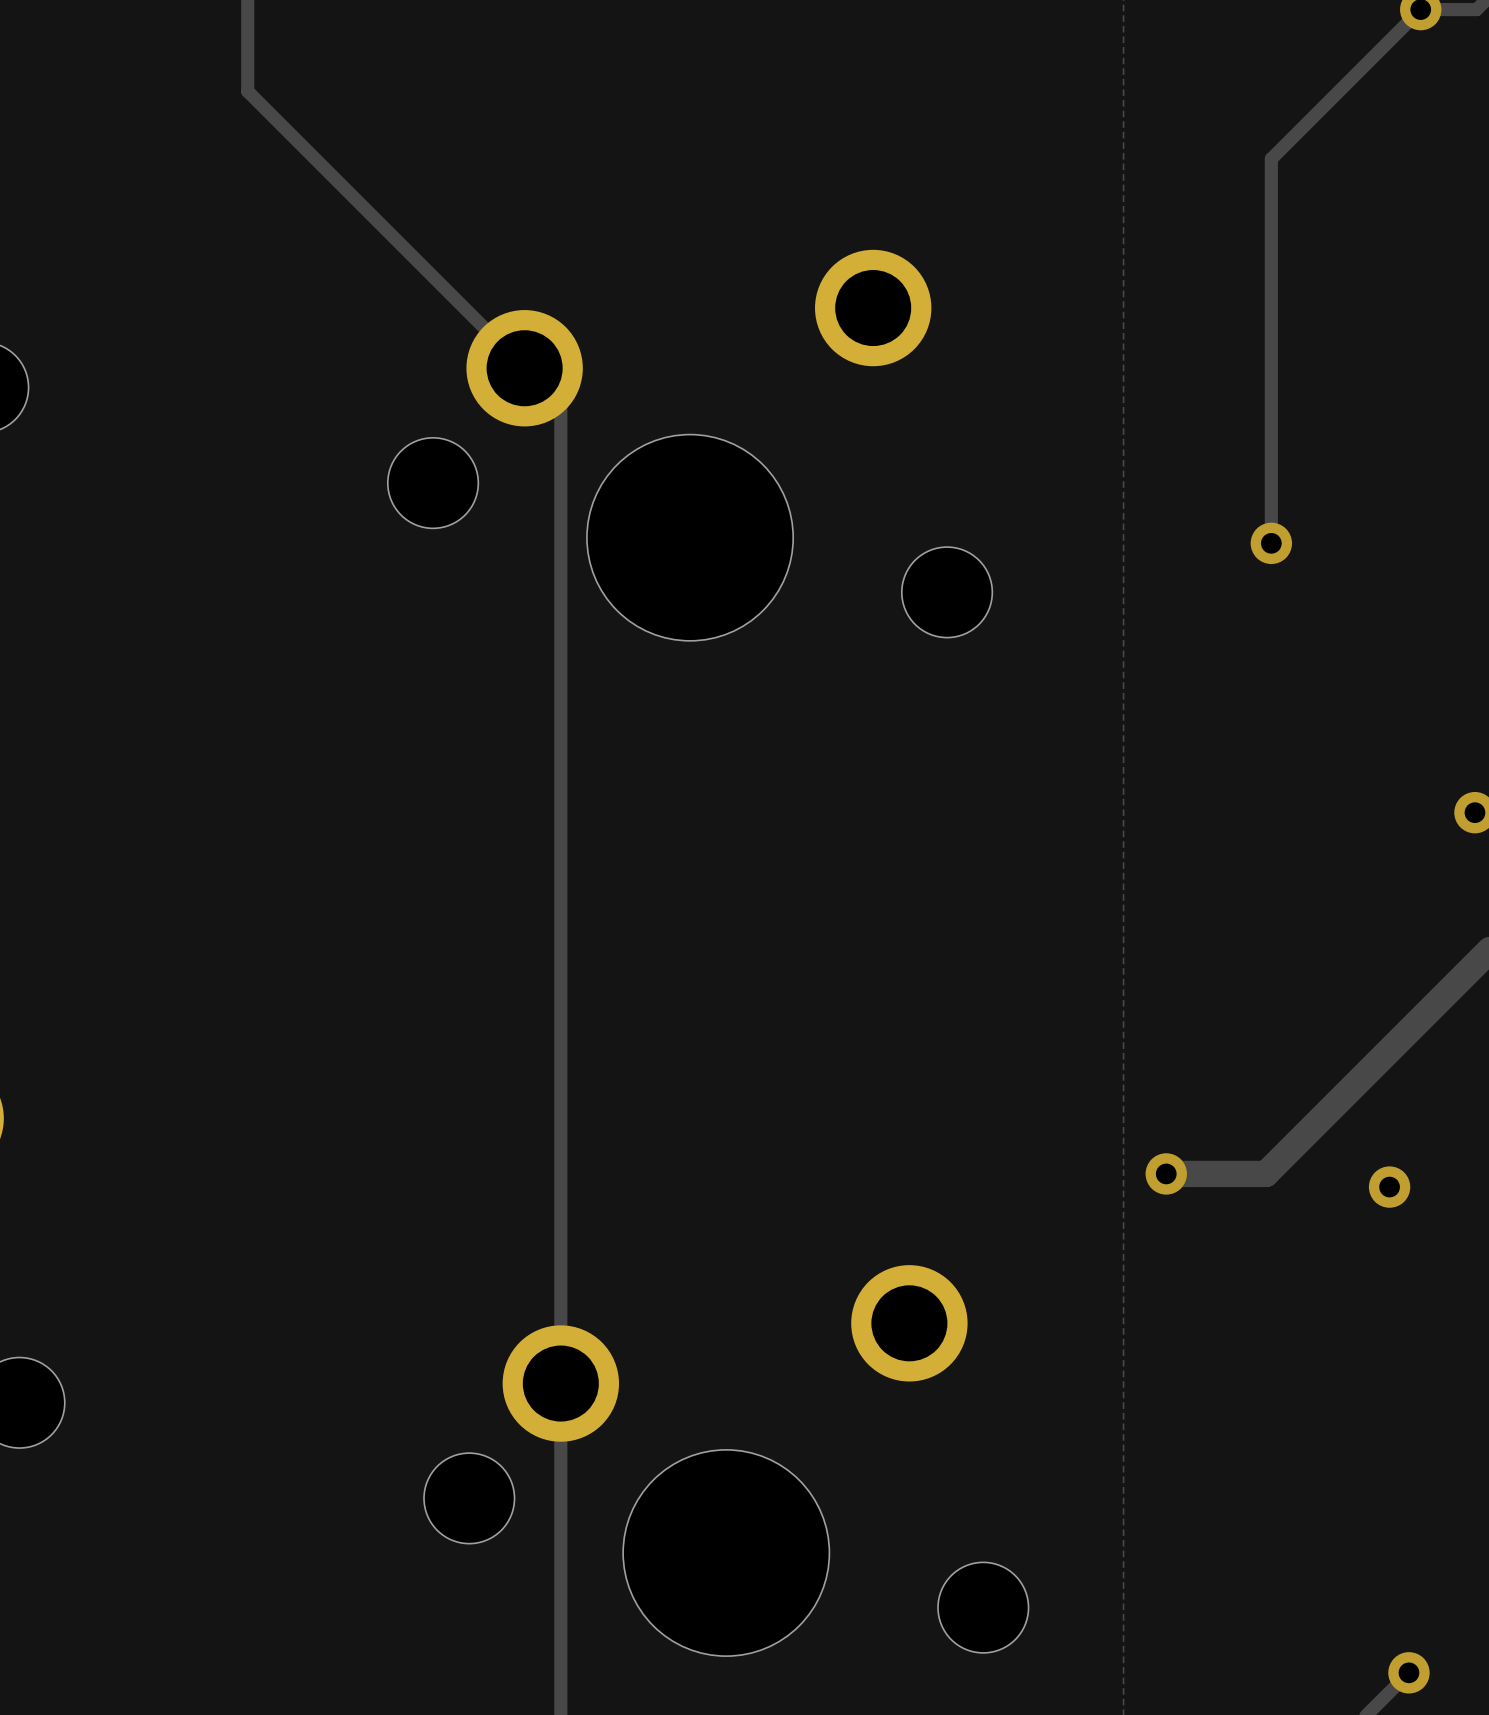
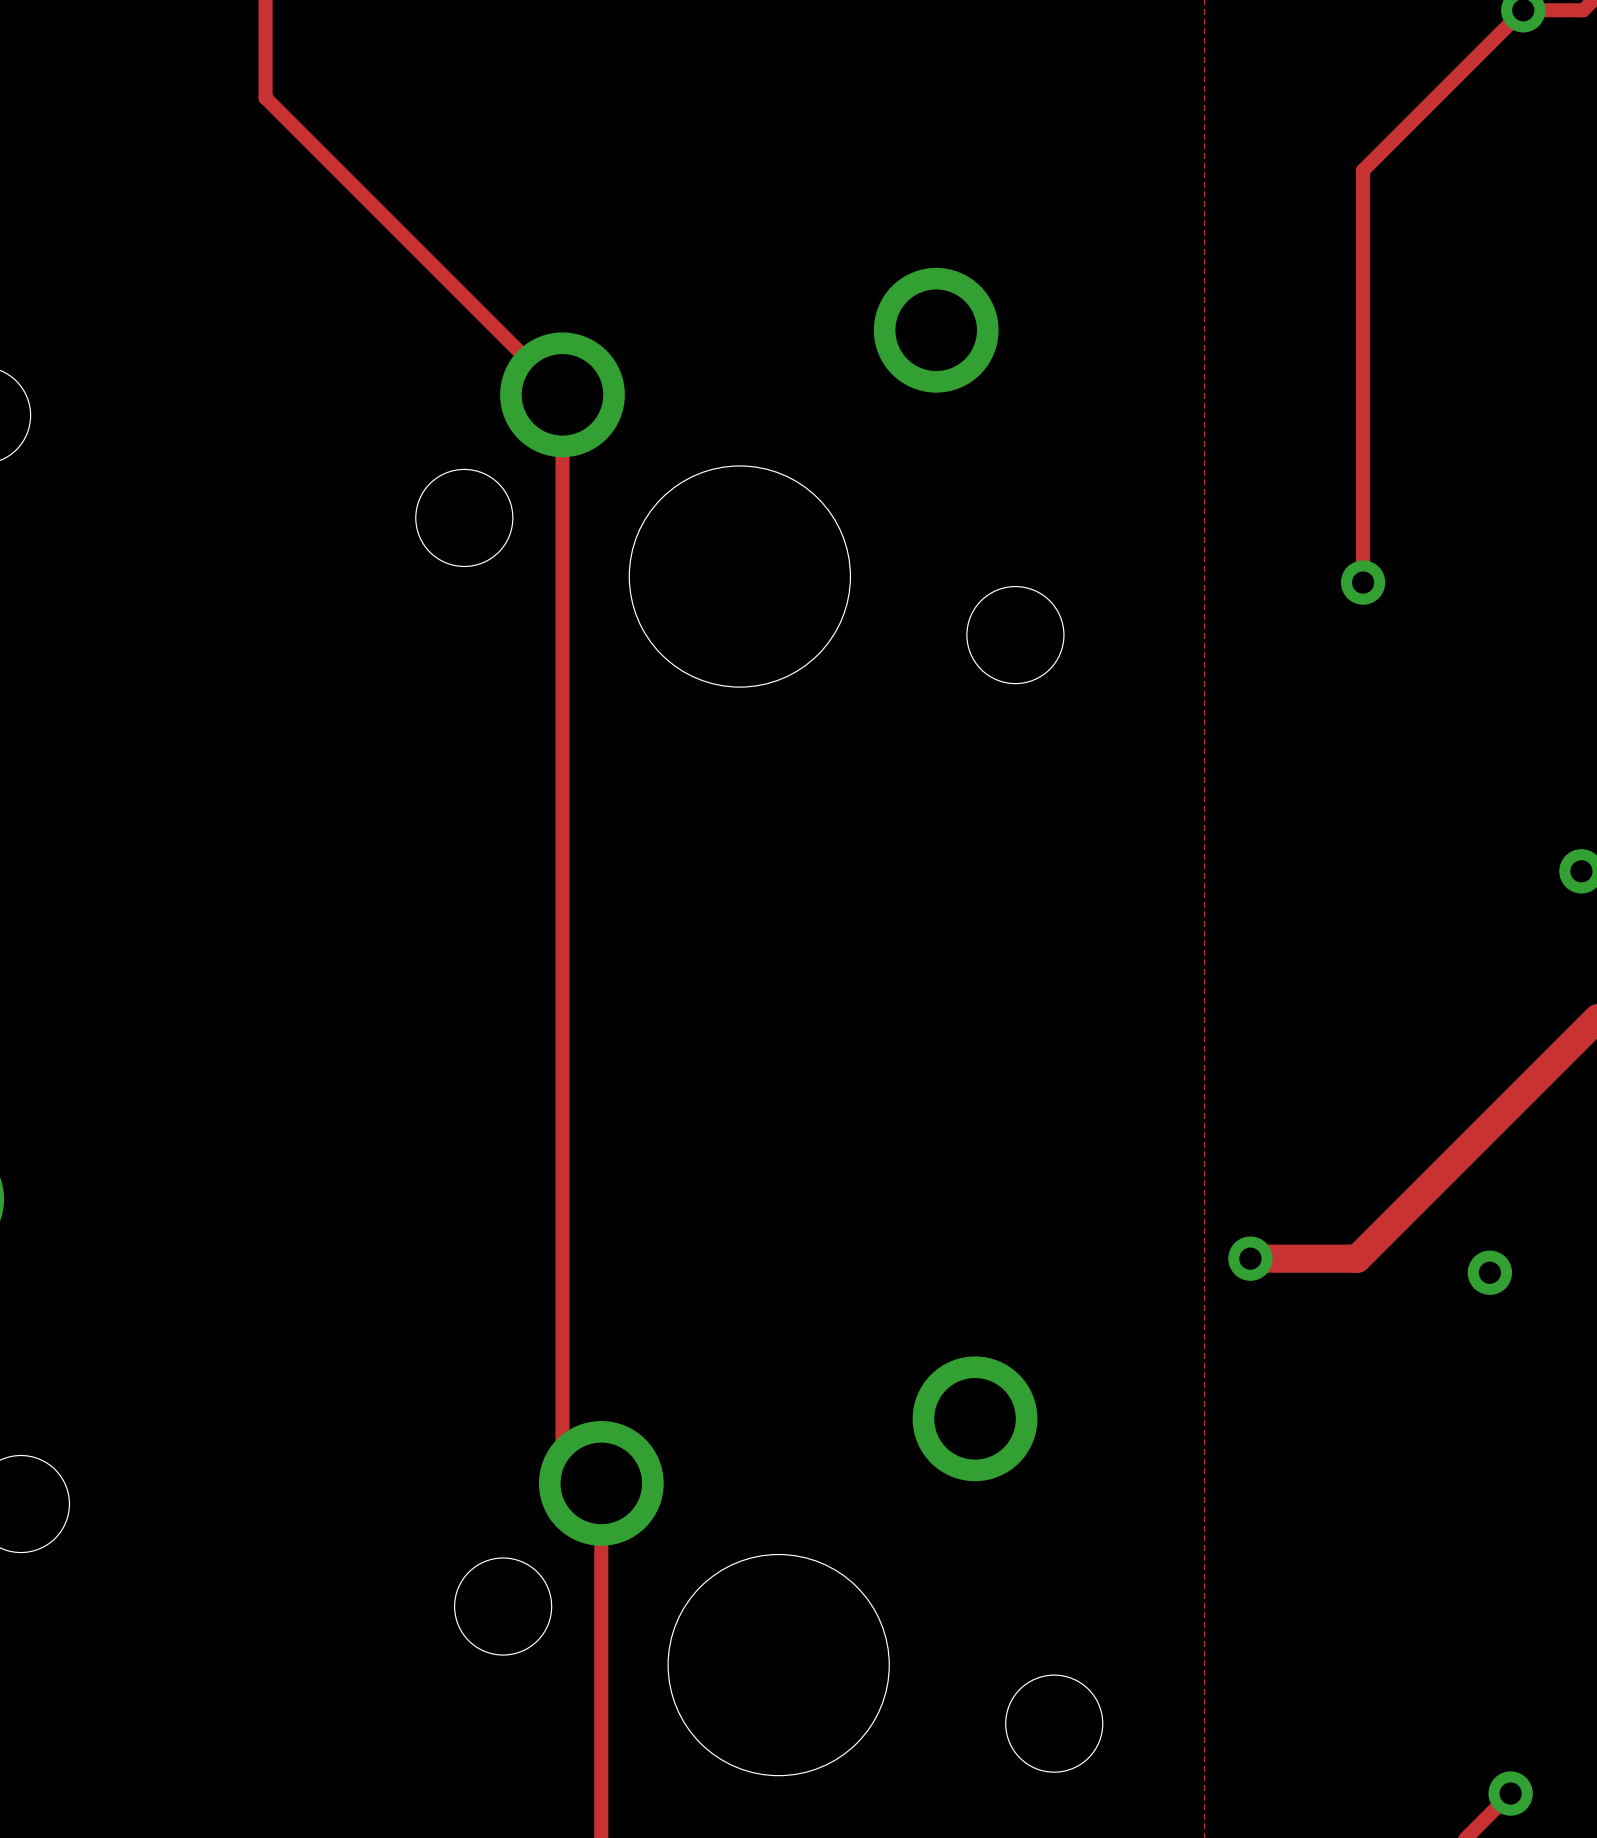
track: (524, 368) (560, 404) (560, 1383) -> (562, 394) (562, 1444) (601, 1483)

